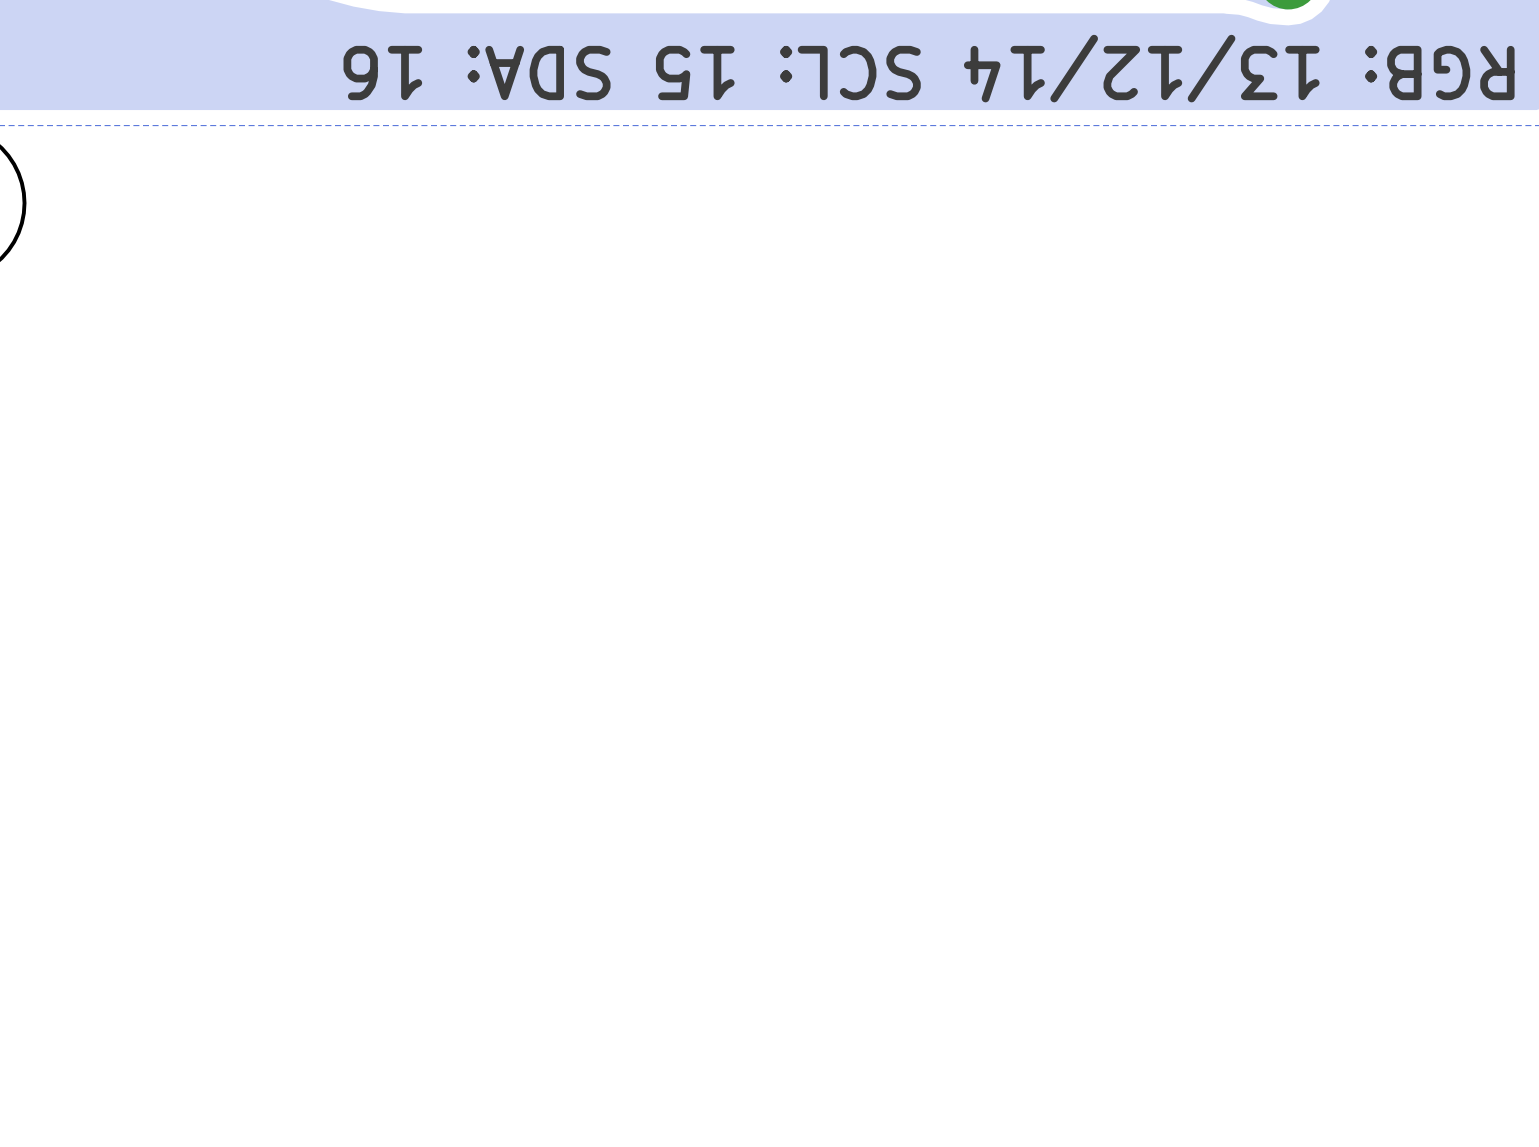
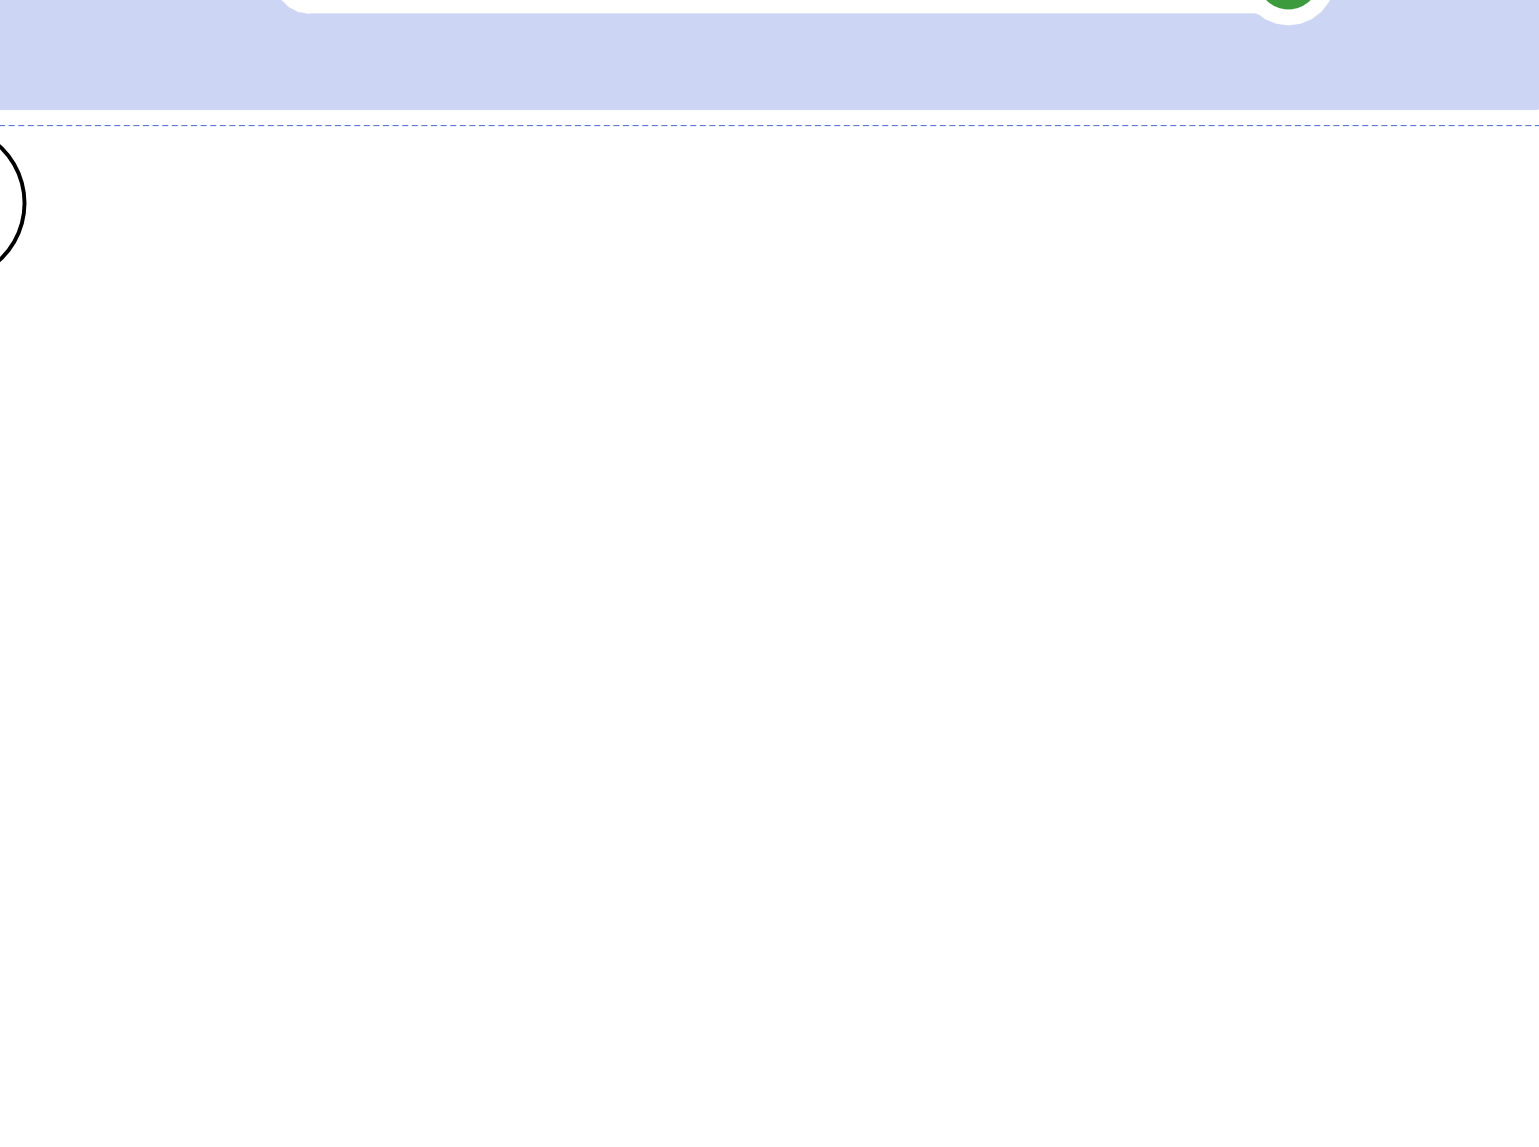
text: RGB: 13/12/14 SCL: 15 SDA: 16 (929, 68) -> none

